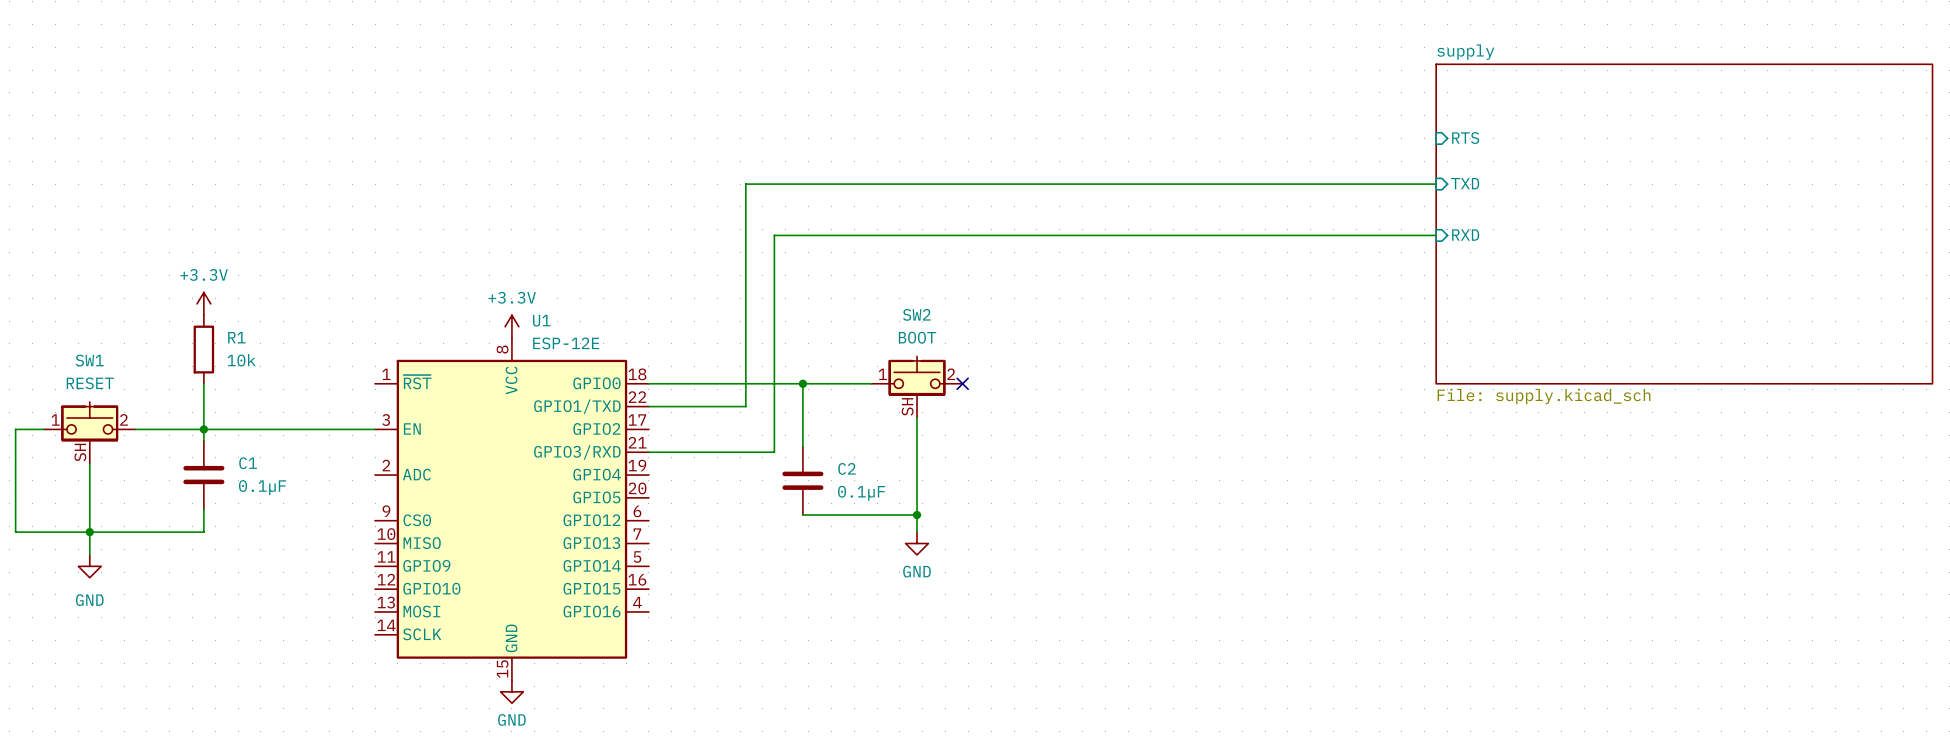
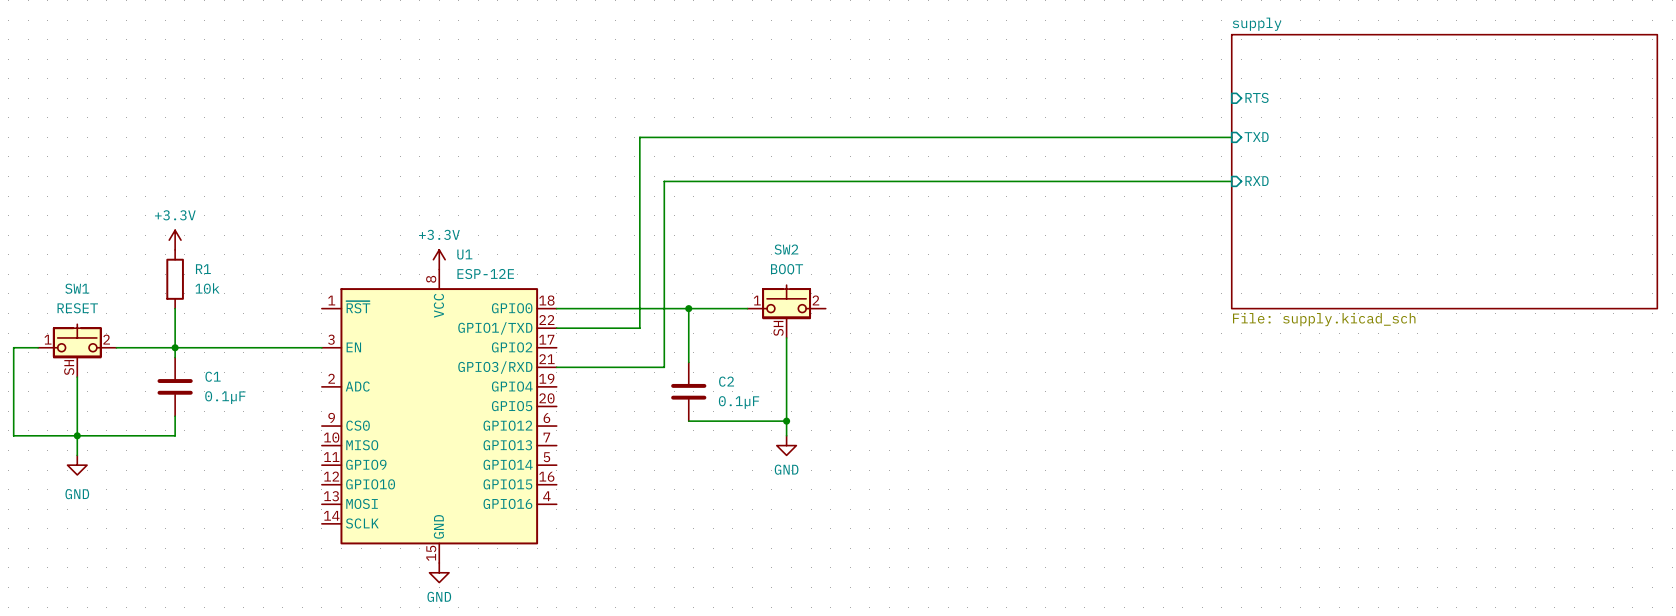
no-connect mark: (962, 383) -> none

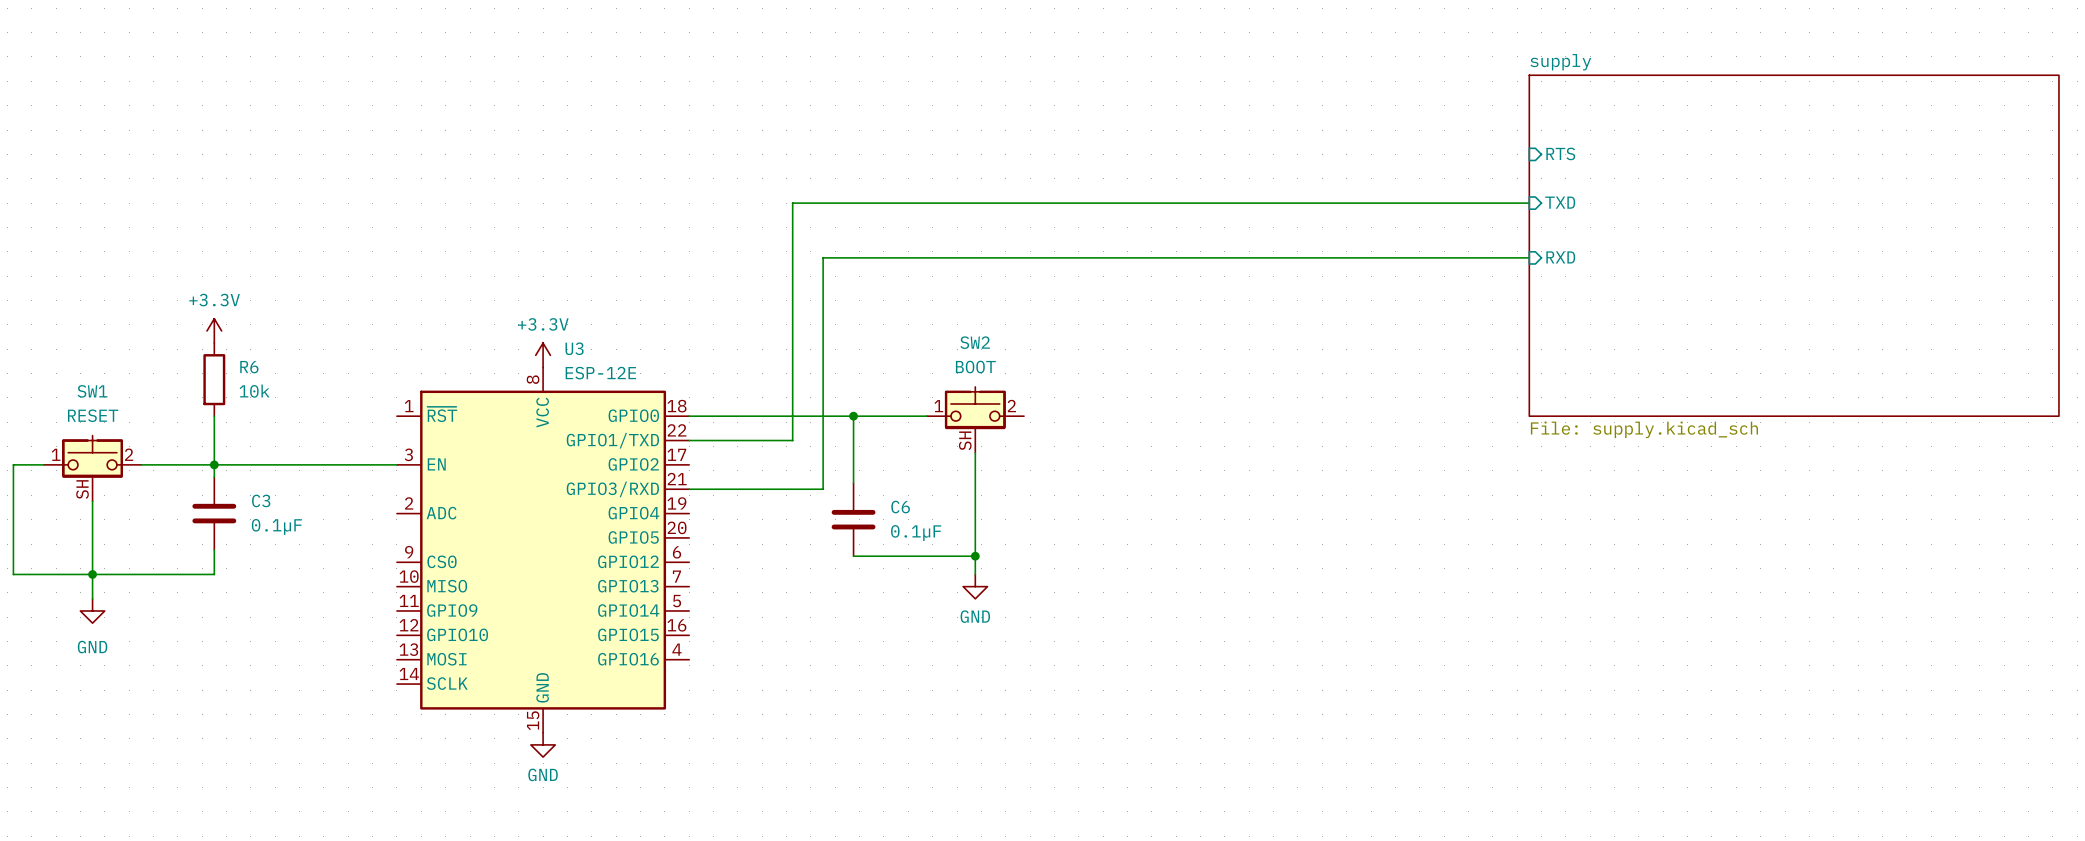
U1 name: U1 (464, 254) -> U3 (574, 348)
R1 name: R1 (203, 269) -> R6 (249, 367)
C1 name: C1 (213, 376) -> C3 (261, 500)
C2 name: C2 (726, 381) -> C6 (900, 507)

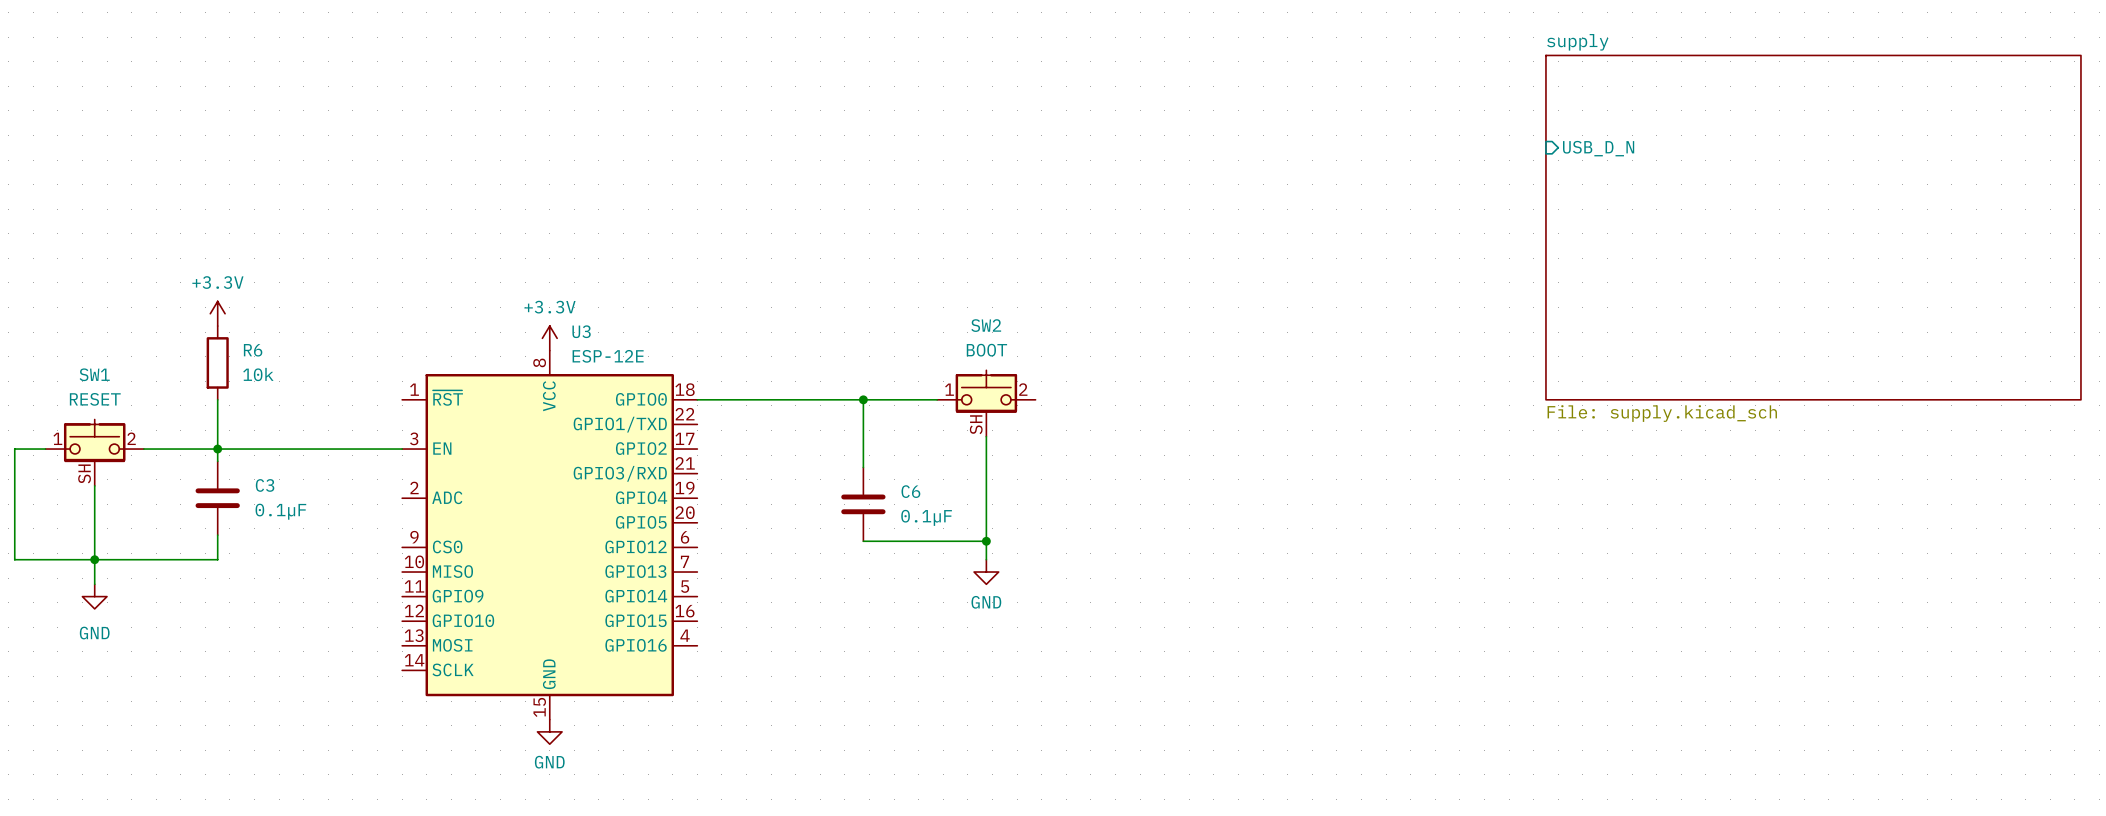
sheet pin: RTS (1560, 153) -> none
sheet pin: none -> USB_D_N (1598, 148)
sheet pin: TXD (1560, 202) -> none
wire: (1529, 203) (792, 203) (792, 440) (689, 440) -> none
wire: (1529, 257) (823, 257) (823, 489) (689, 489) -> none
sheet pin: RXD (1560, 257) -> none

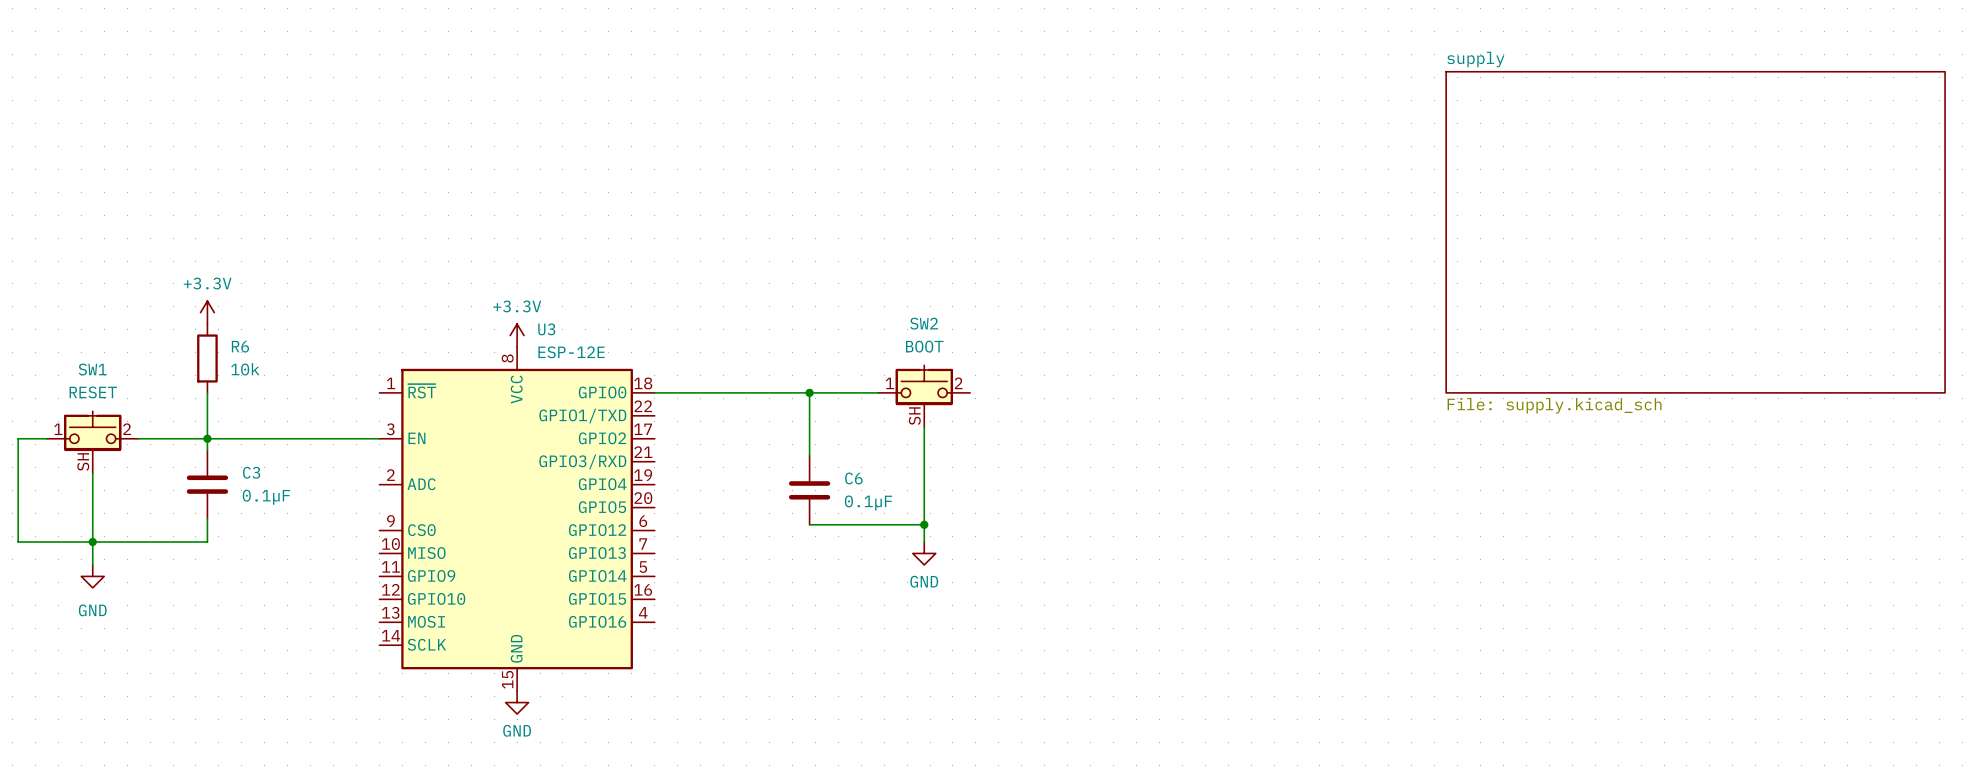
sheet pin: USB_D_N (1598, 148) -> none

